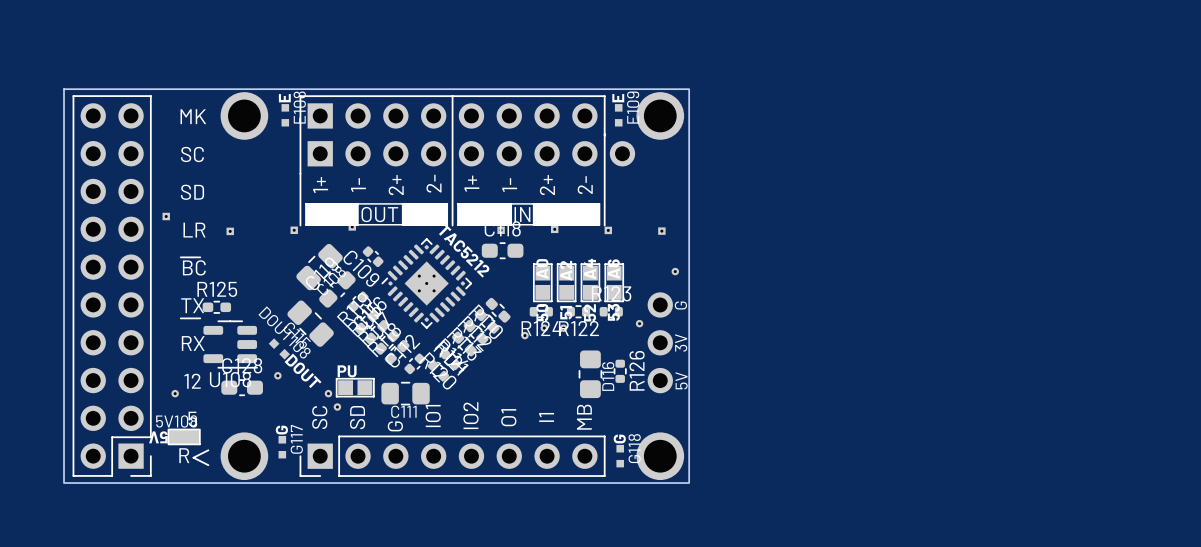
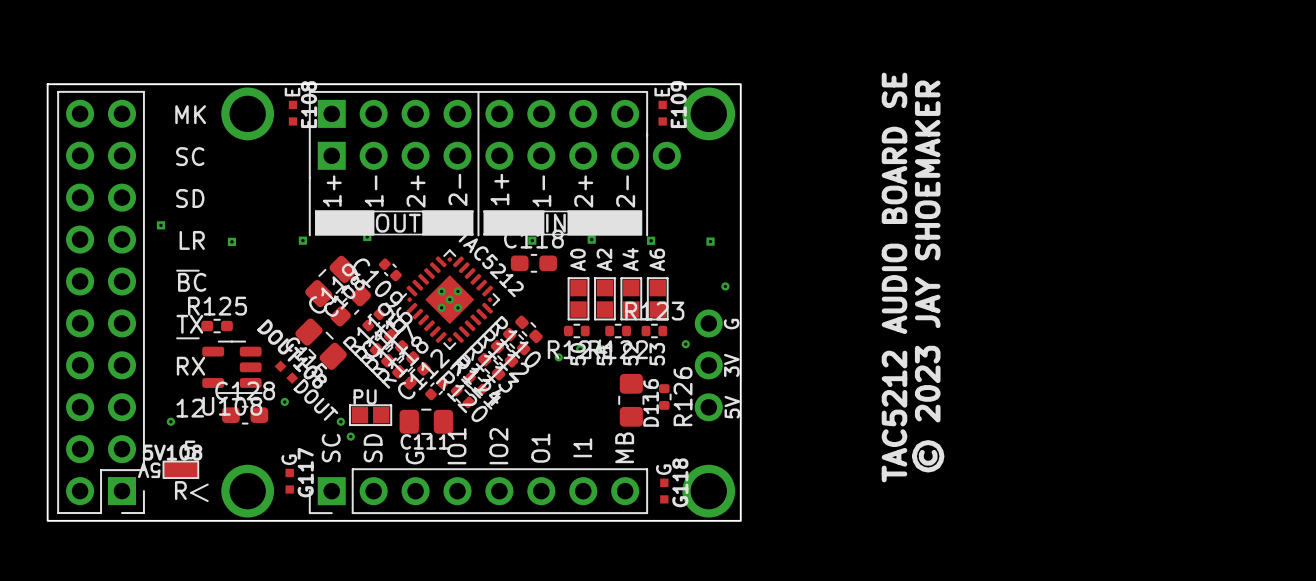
text: none -> TAC5212 AUDIO BOARD SE (894, 277)
text: none -> © 2023 JAY SHOEMAKER (928, 276)

